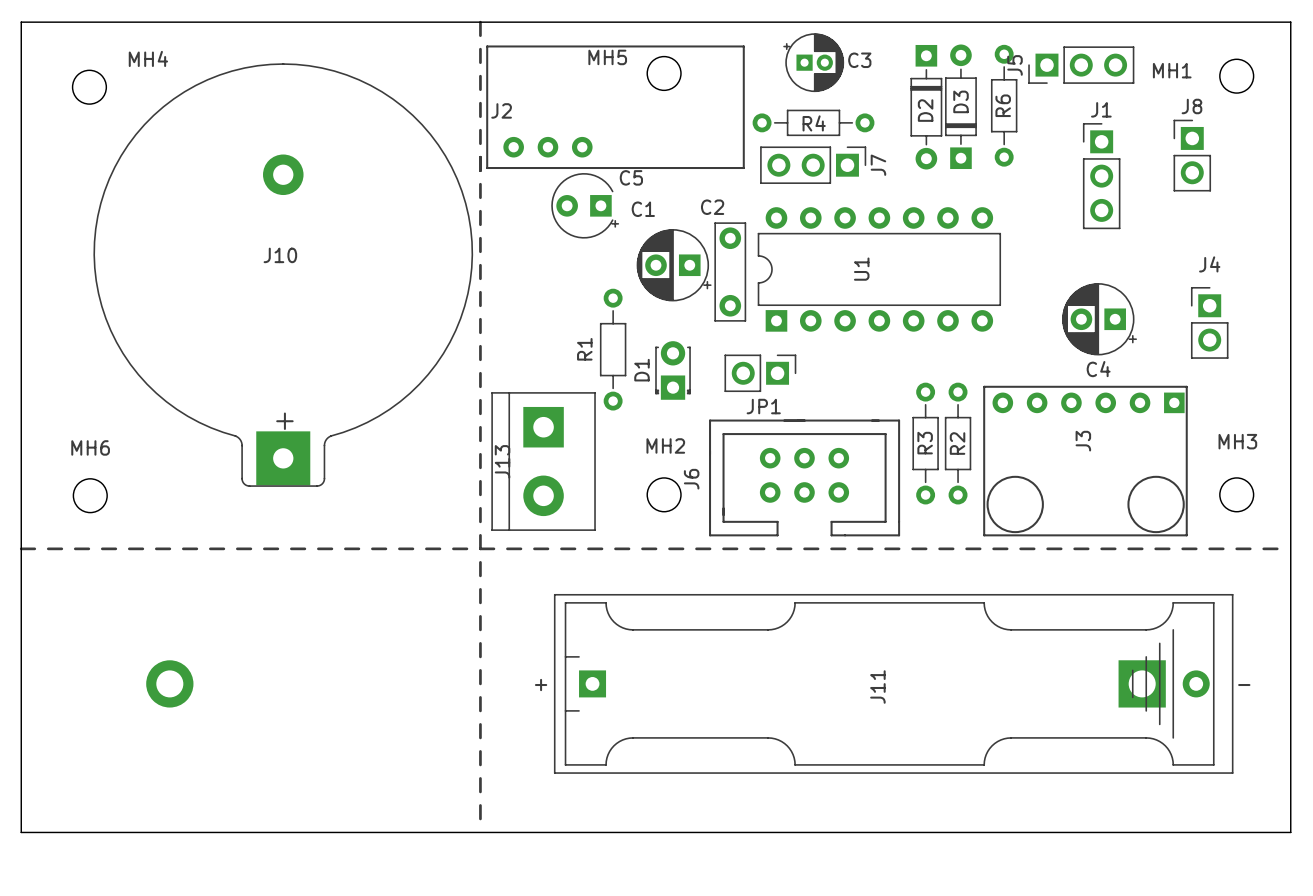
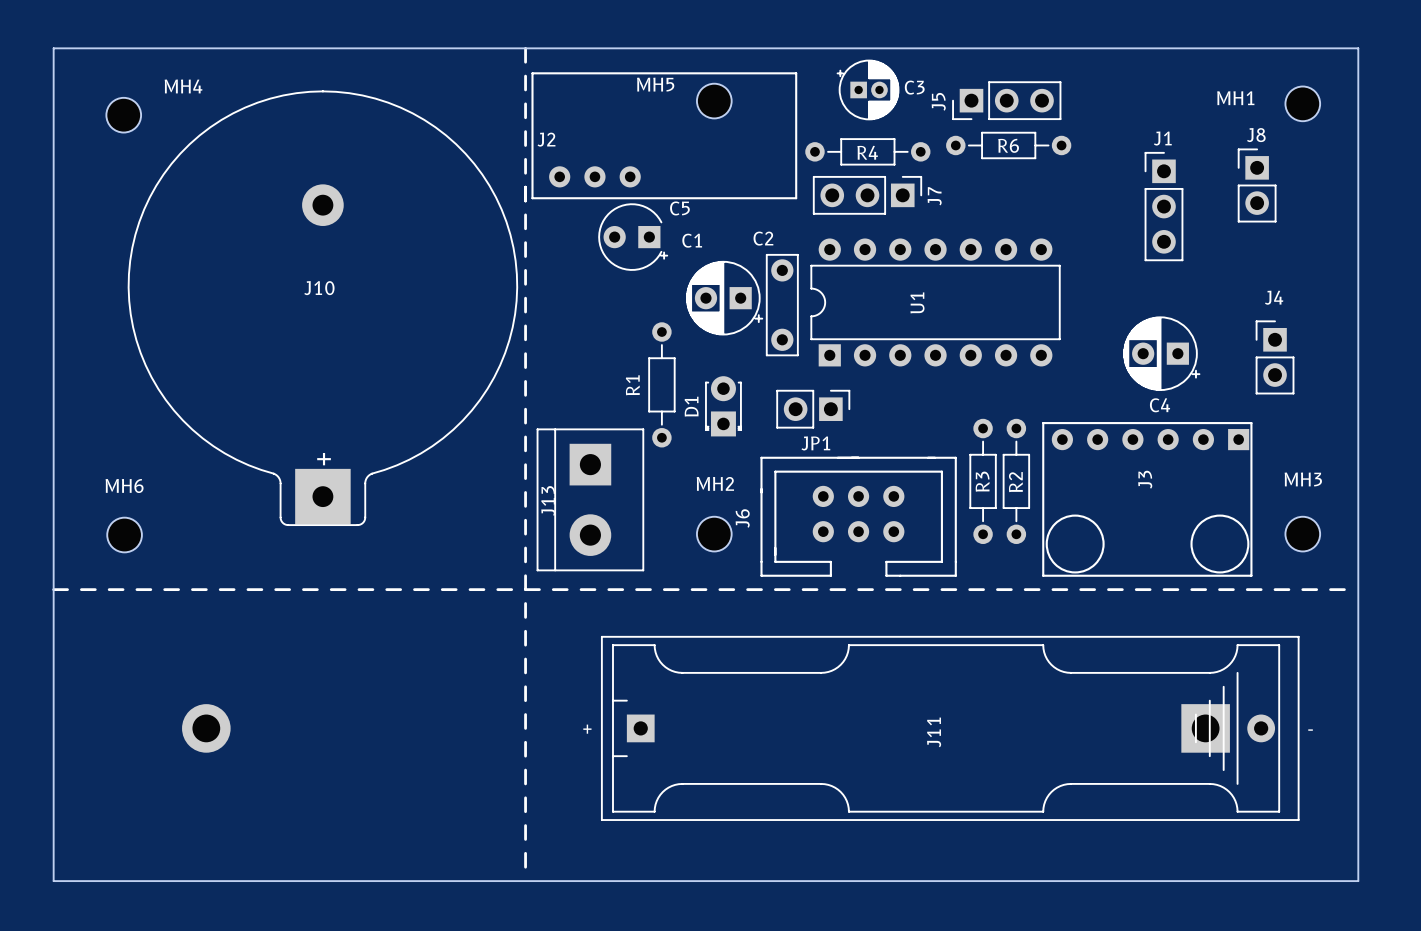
J5 position: (1081, 65) -> (1006, 100)
R6 rotation: 0° (1004, 105) -> 90° clockwise (1008, 145)
D3: (960, 106) -> none
D2: (926, 107) -> none

